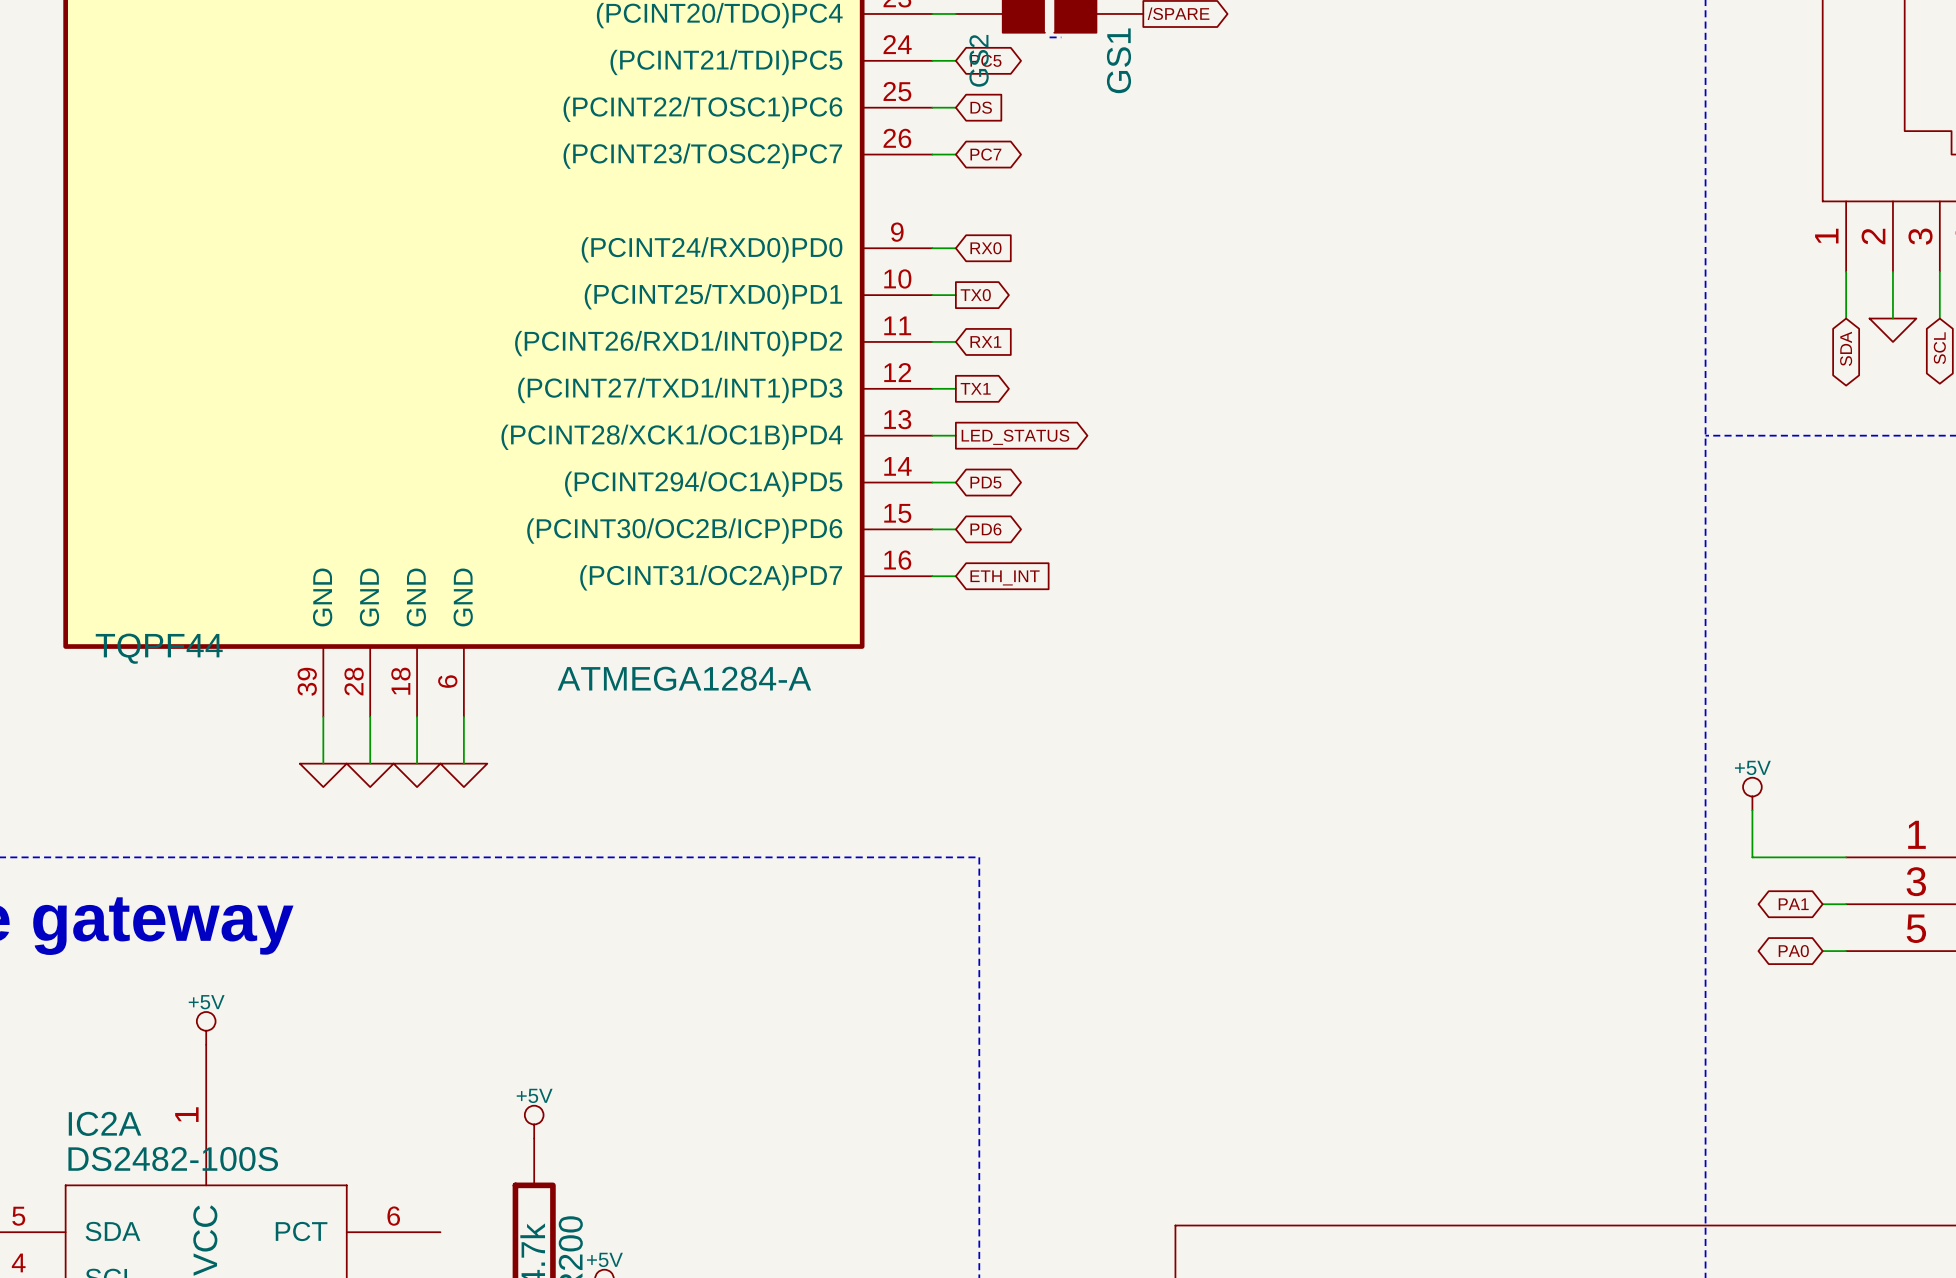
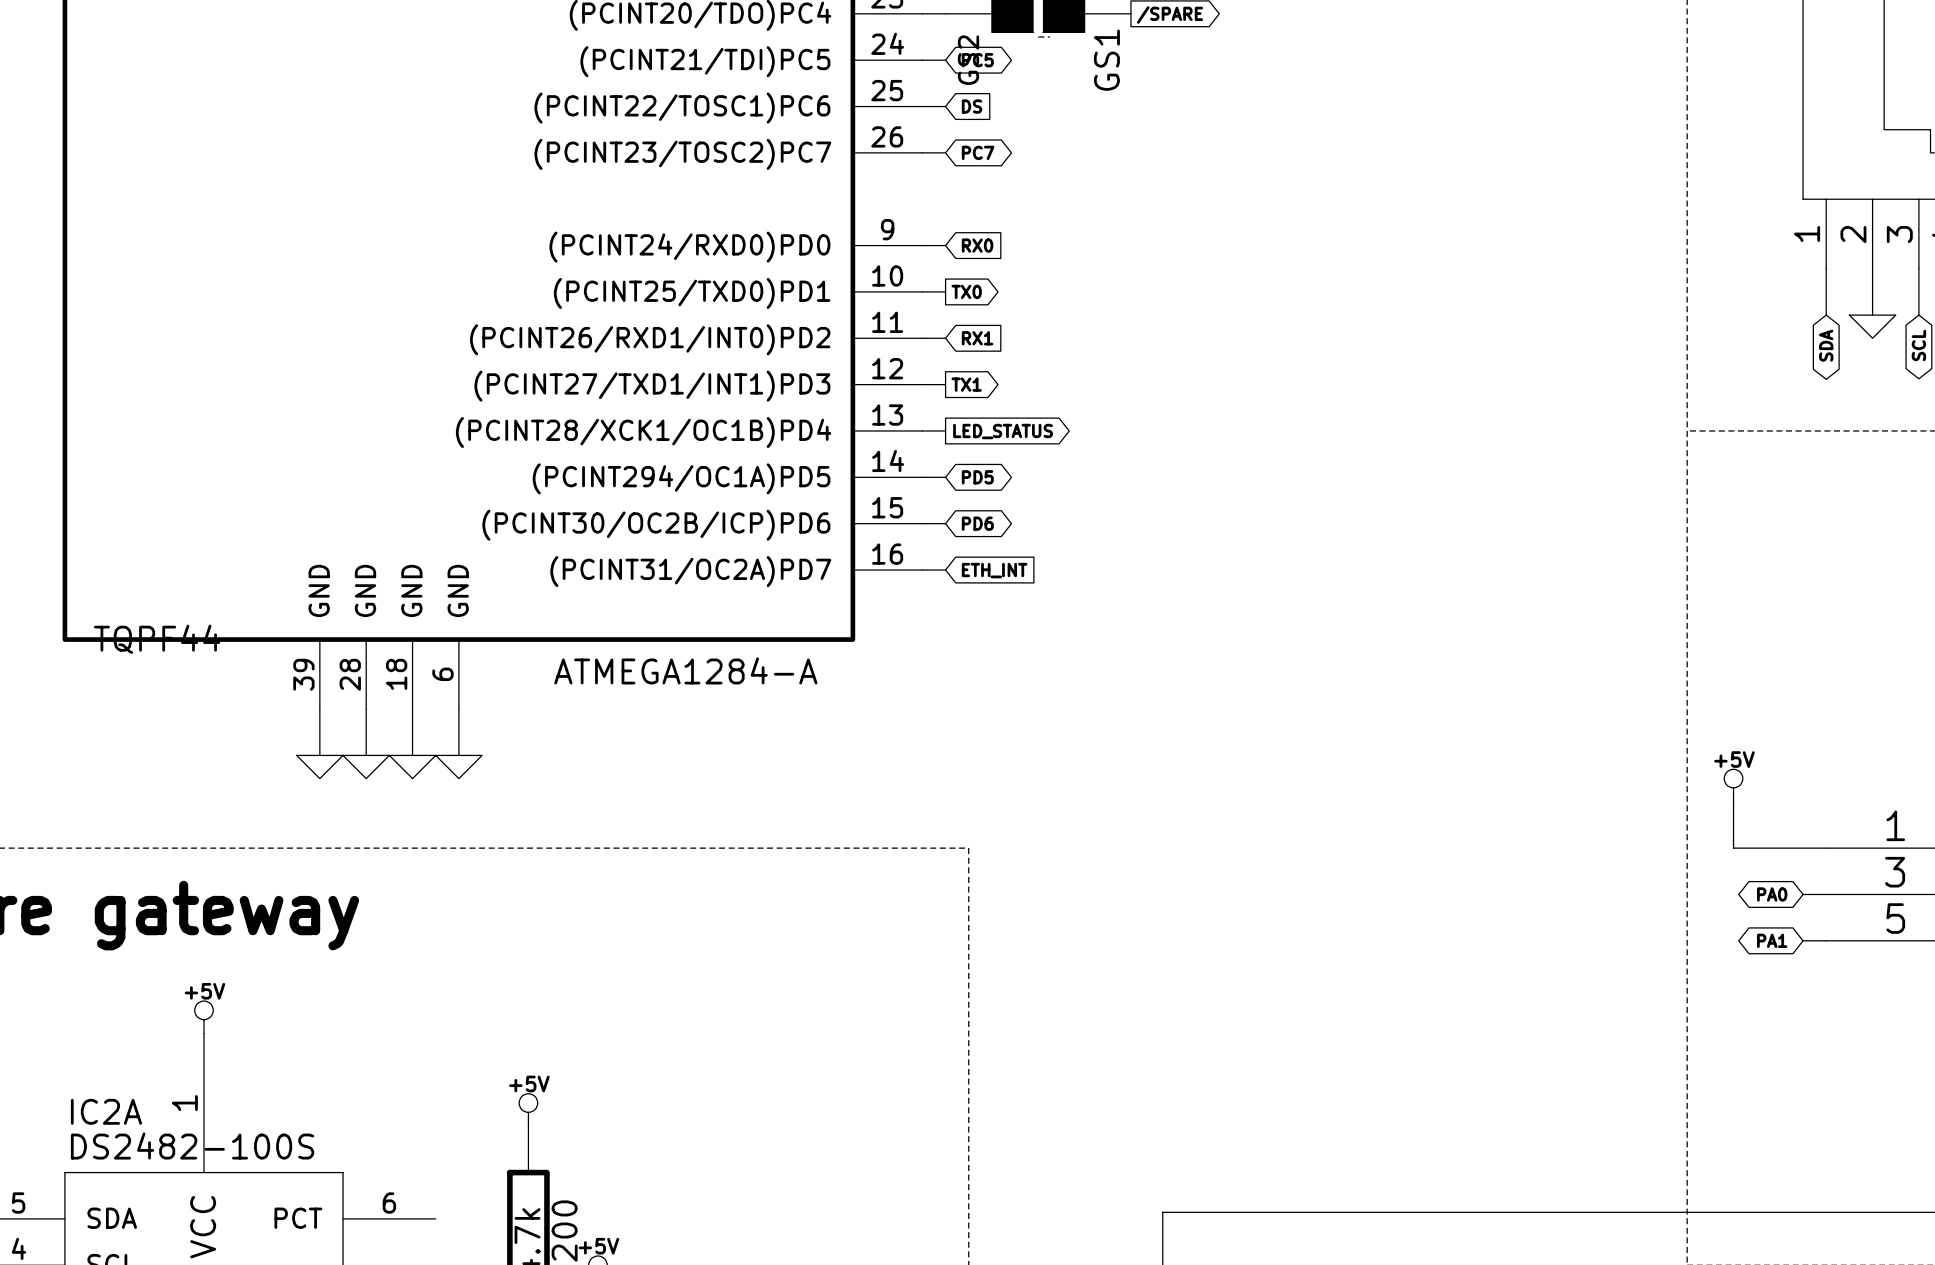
global label: PA1 (1793, 904) -> PA0 (1772, 894)
global label: PA0 (1793, 951) -> PA1 (1772, 940)

